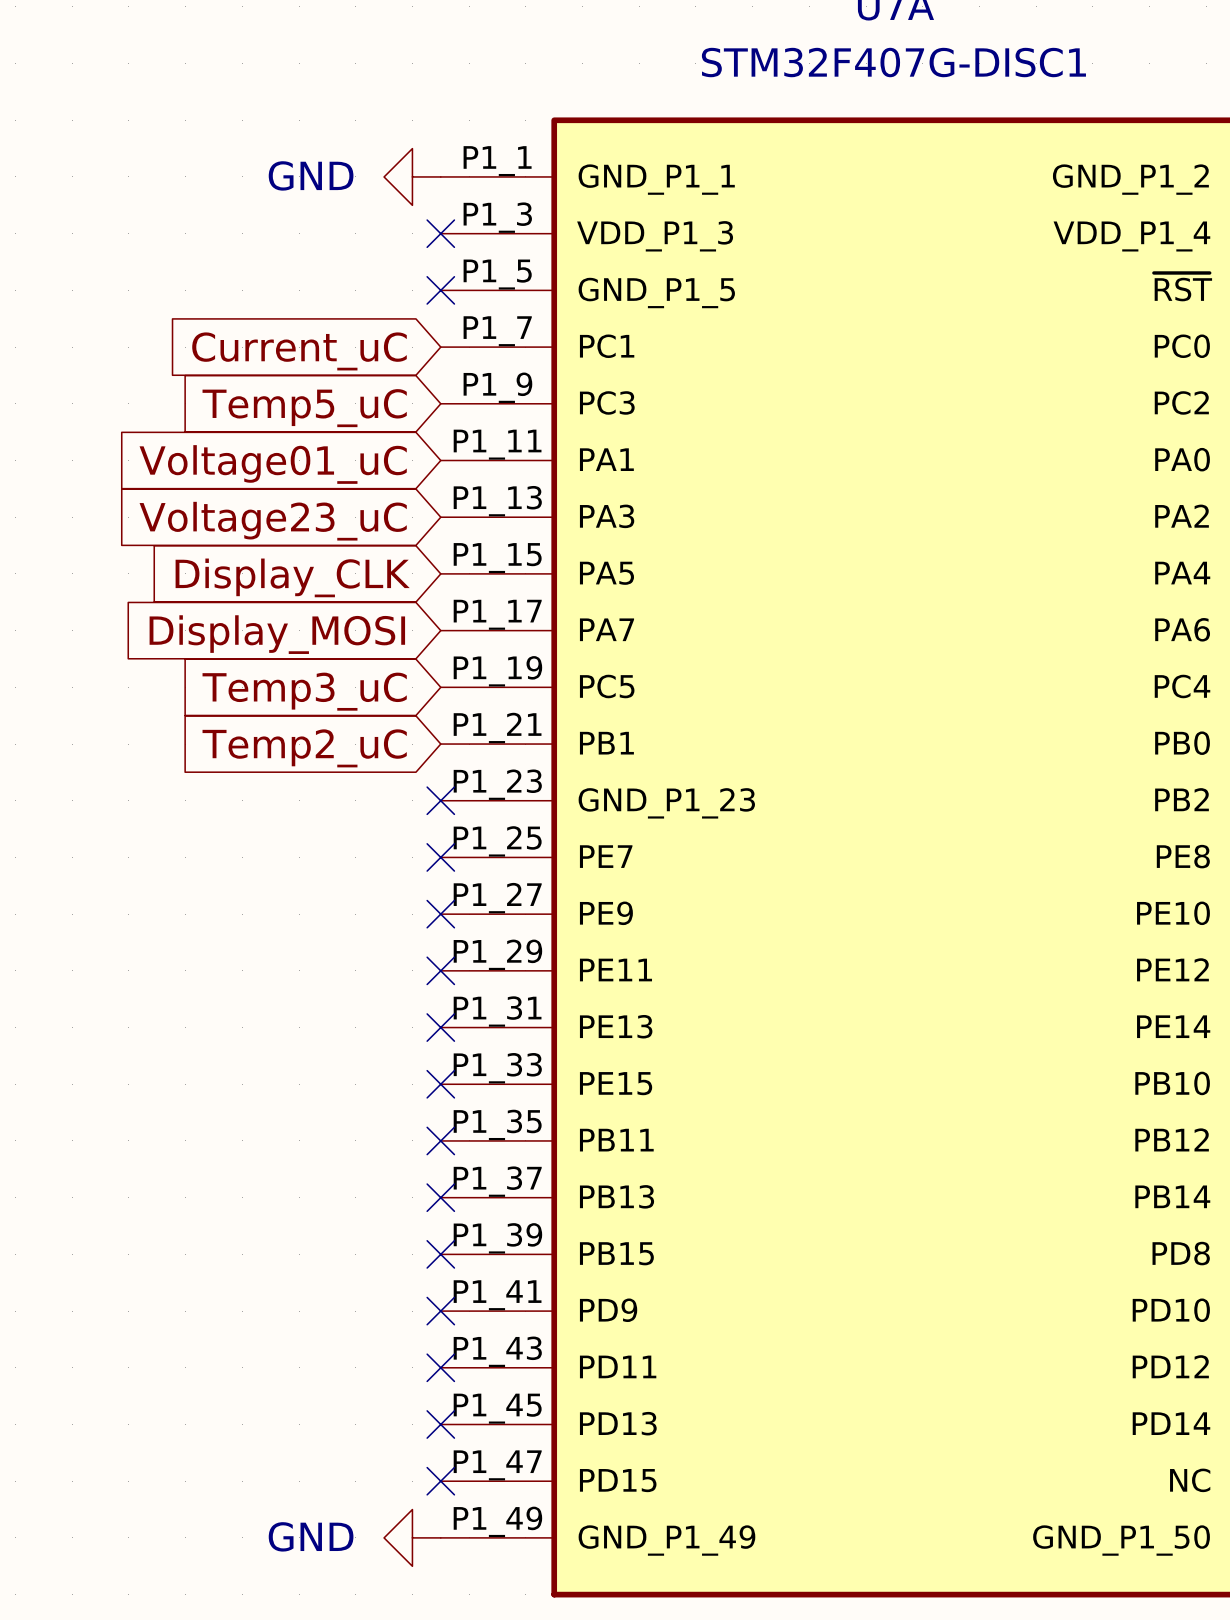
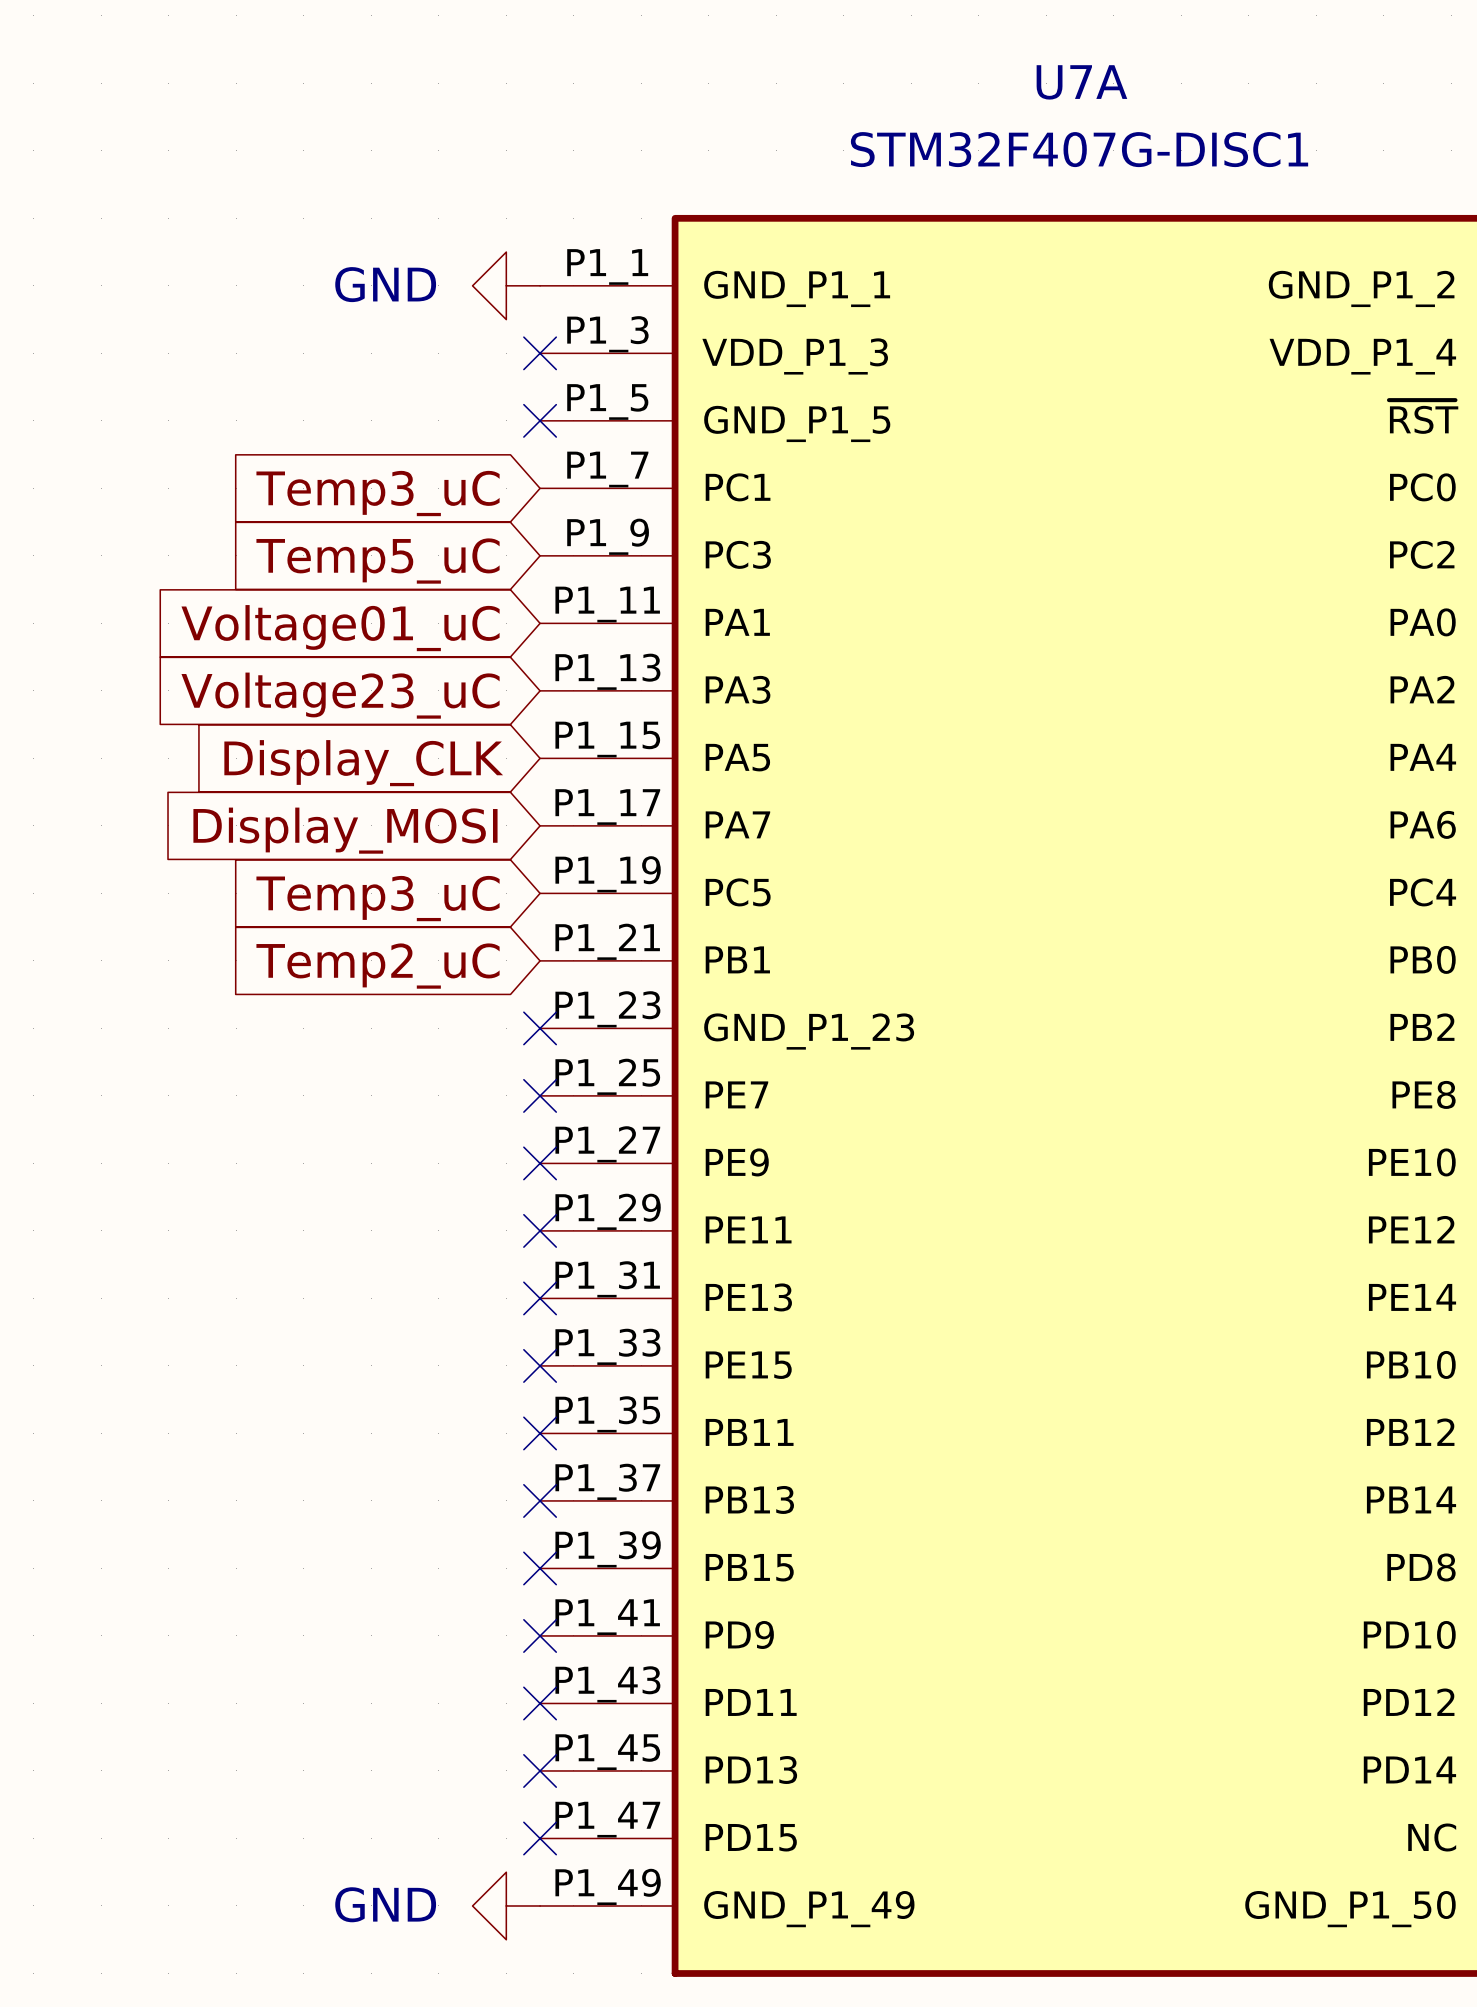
global label: Current_uC (299, 351) -> Temp3_uC (378, 493)

